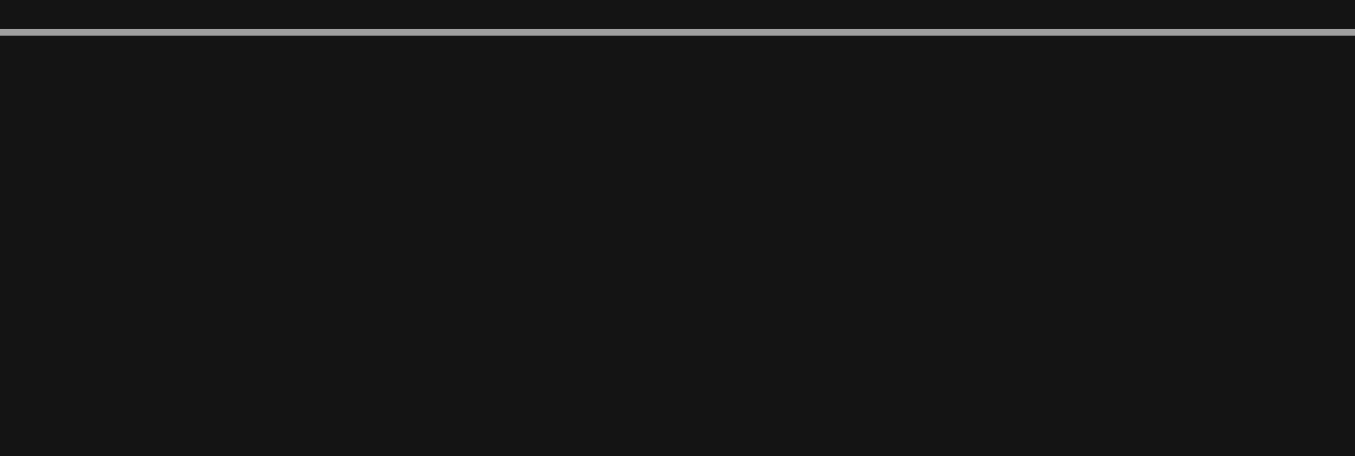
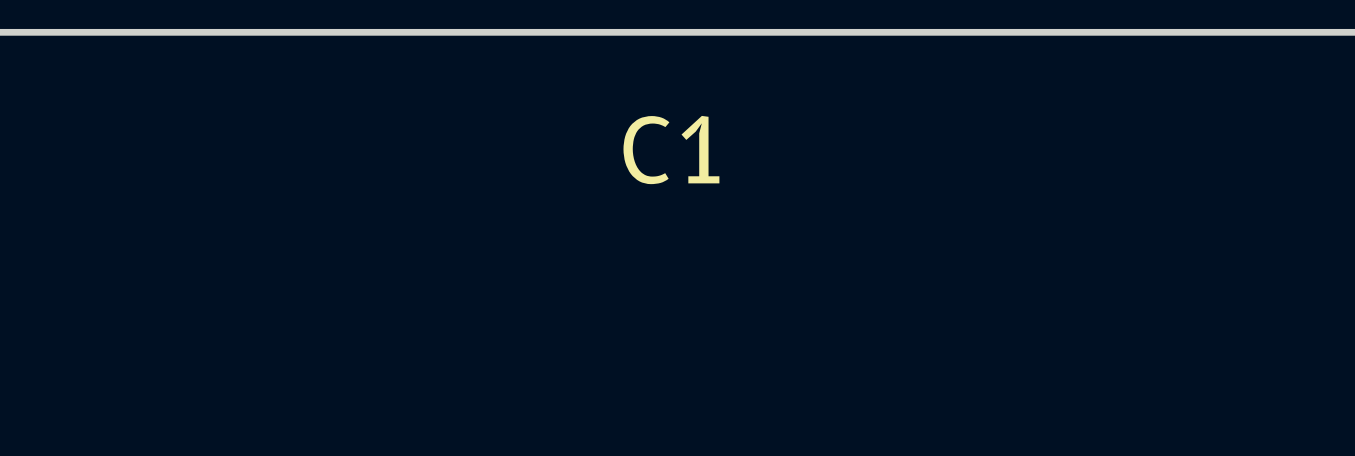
text: none -> C1 (671, 150)

